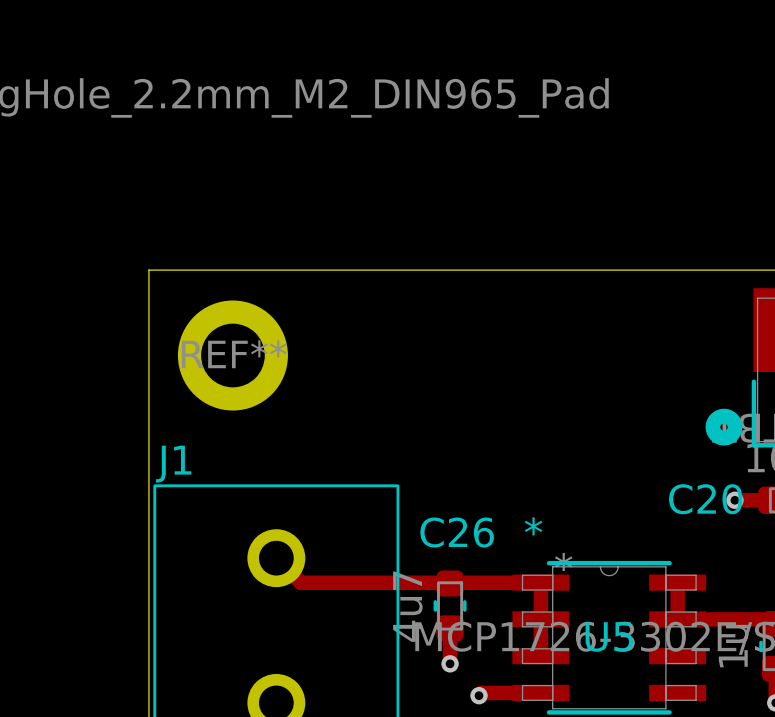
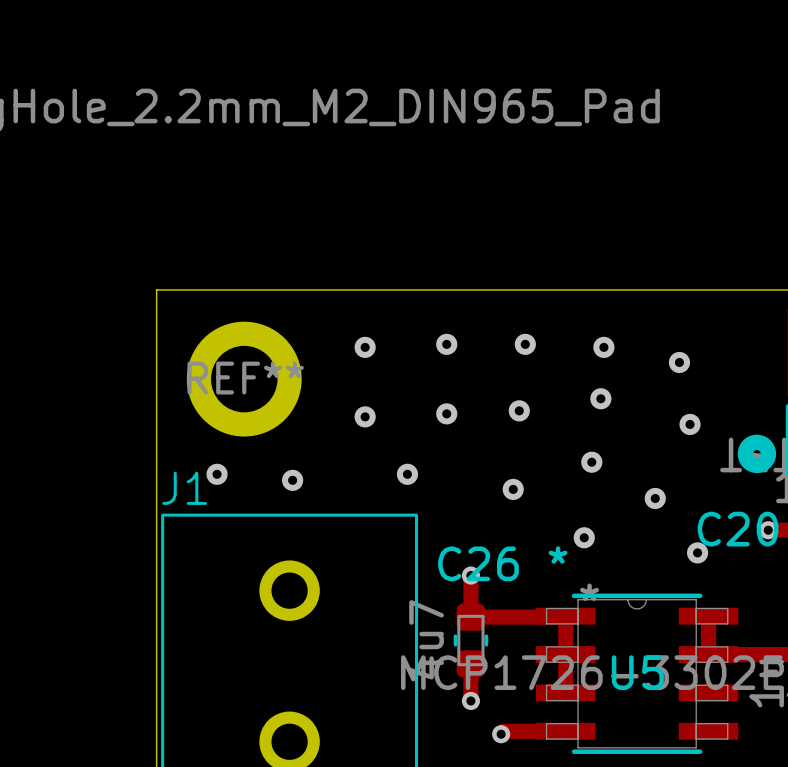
via: none -> (446, 344)
via: none -> (525, 344)
via: none -> (365, 347)
via: none -> (603, 347)
via: none -> (679, 362)
via: none -> (600, 398)
via: none -> (519, 410)
via: none -> (446, 413)
via: none -> (365, 416)
via: none -> (690, 424)
via: none -> (591, 462)
via: none -> (217, 474)
via: none -> (407, 474)
via: none -> (292, 480)
via: none -> (513, 489)
via: none -> (655, 498)
via: none -> (584, 537)
via: none -> (697, 552)
via: none -> (470, 575)
track: (276, 558) (300, 582) (540, 582) -> (470, 575) (470, 617) (565, 616)

